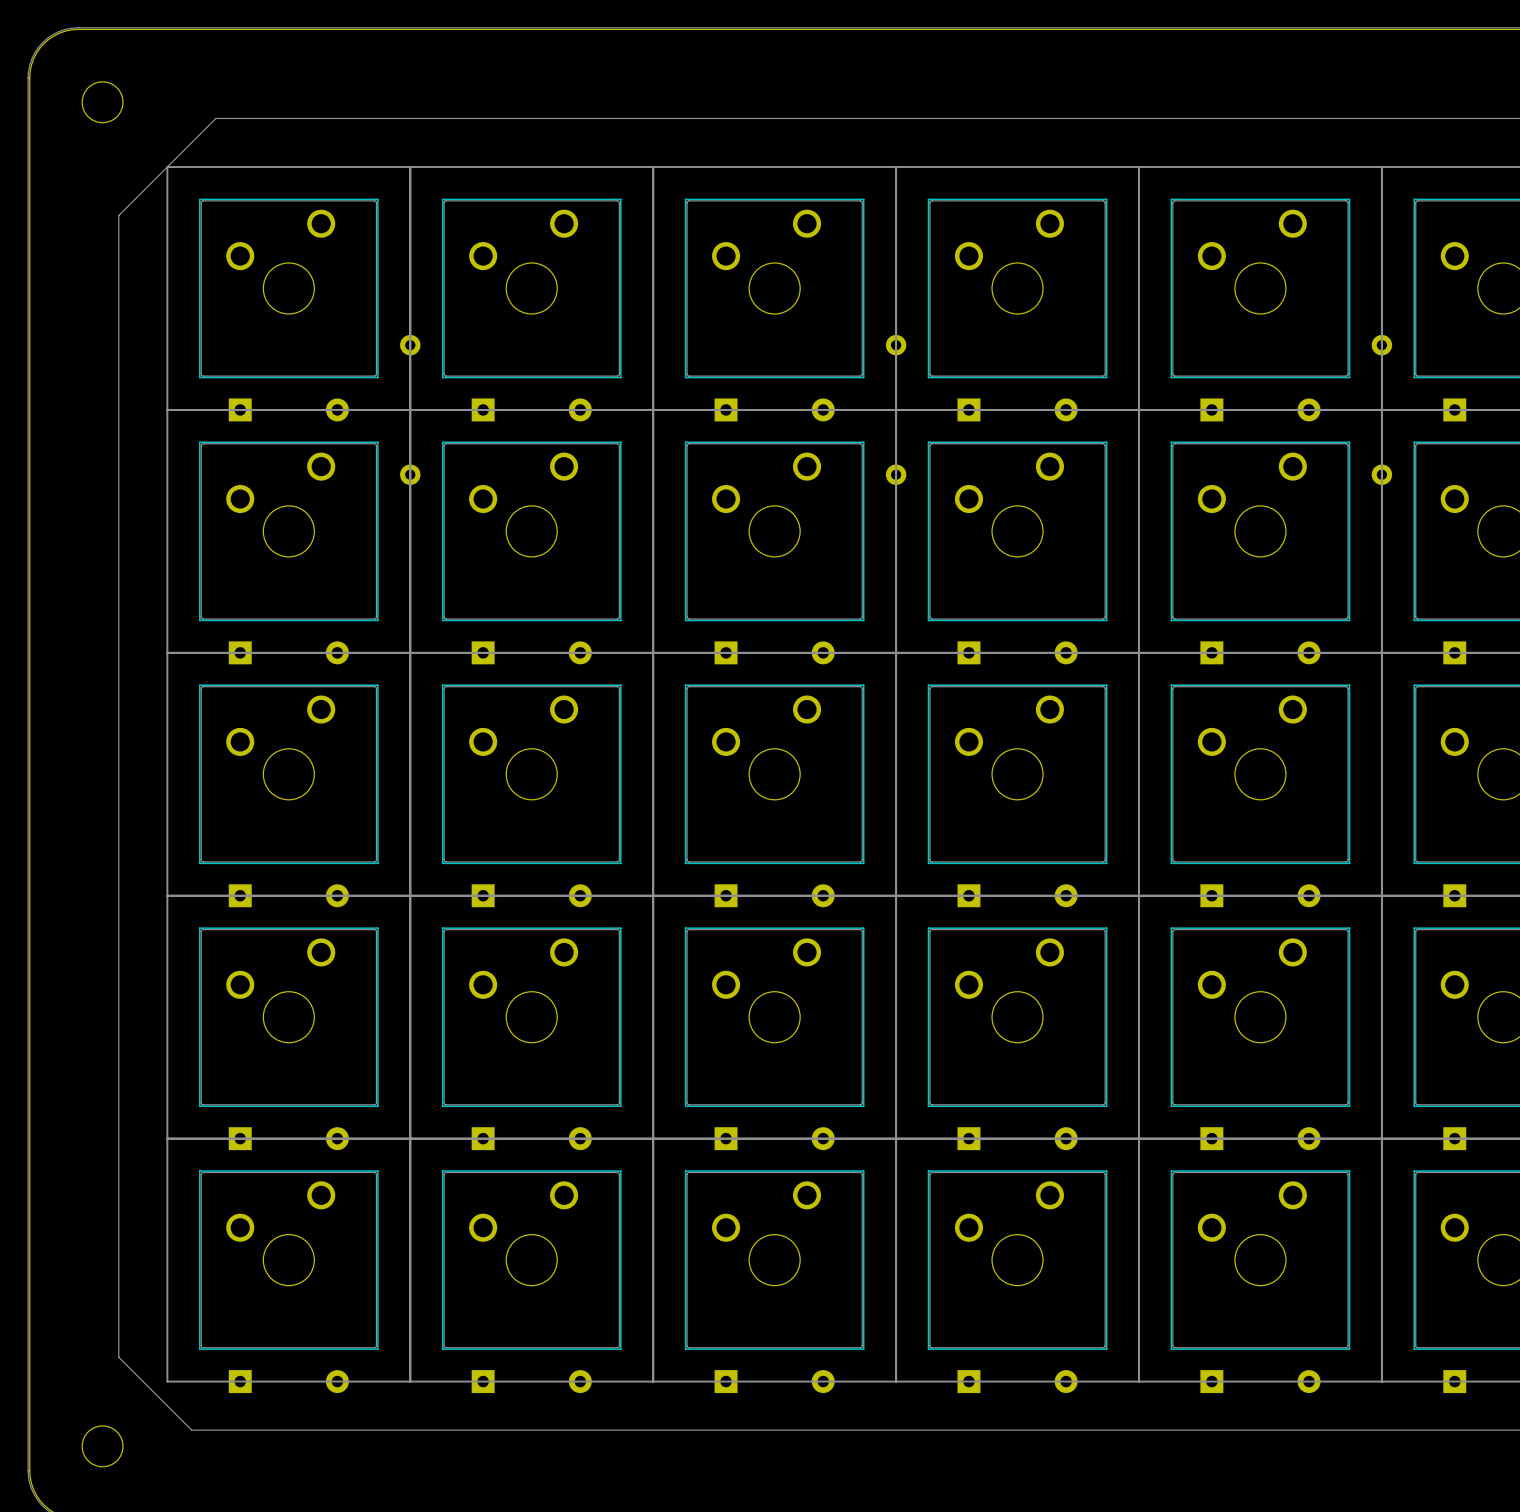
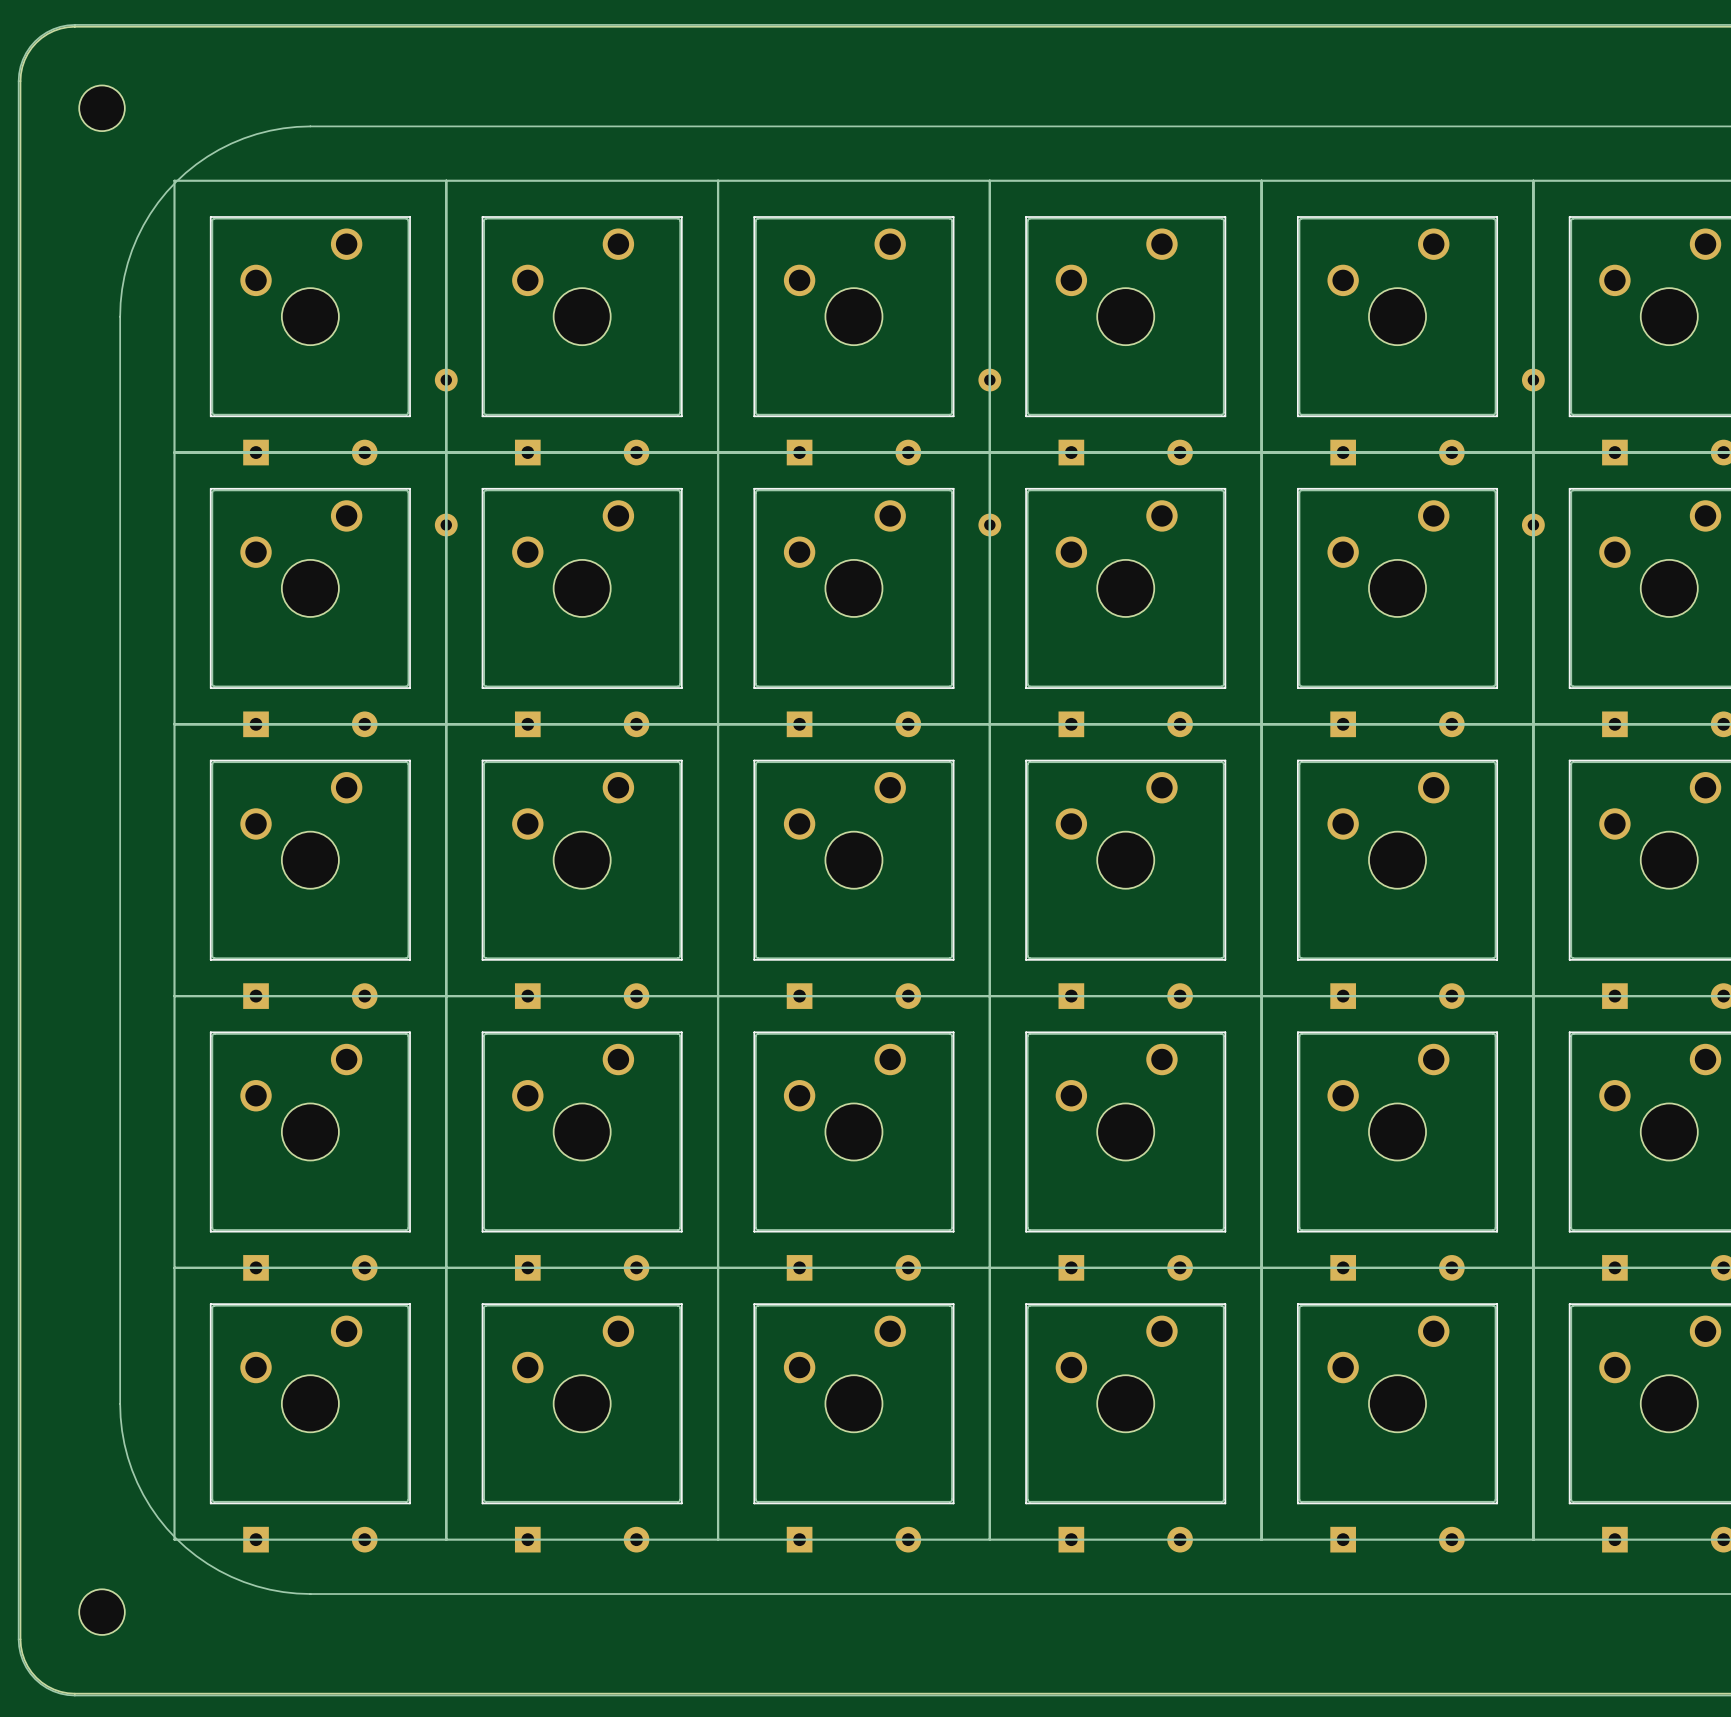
line: (288, 118) (215, 118) (118, 215) (118, 288) -> (310, 126) (283, 128) (243, 138) (207, 156) (175, 182) (150, 213) (137, 237) (124, 276) (120, 316)
line: (118, 1260) (118, 1357) (191, 1430) (288, 1430) -> (120, 1403) (124, 1444) (132, 1470) (150, 1506) (175, 1538) (207, 1563) (243, 1582) (283, 1592) (310, 1594)

